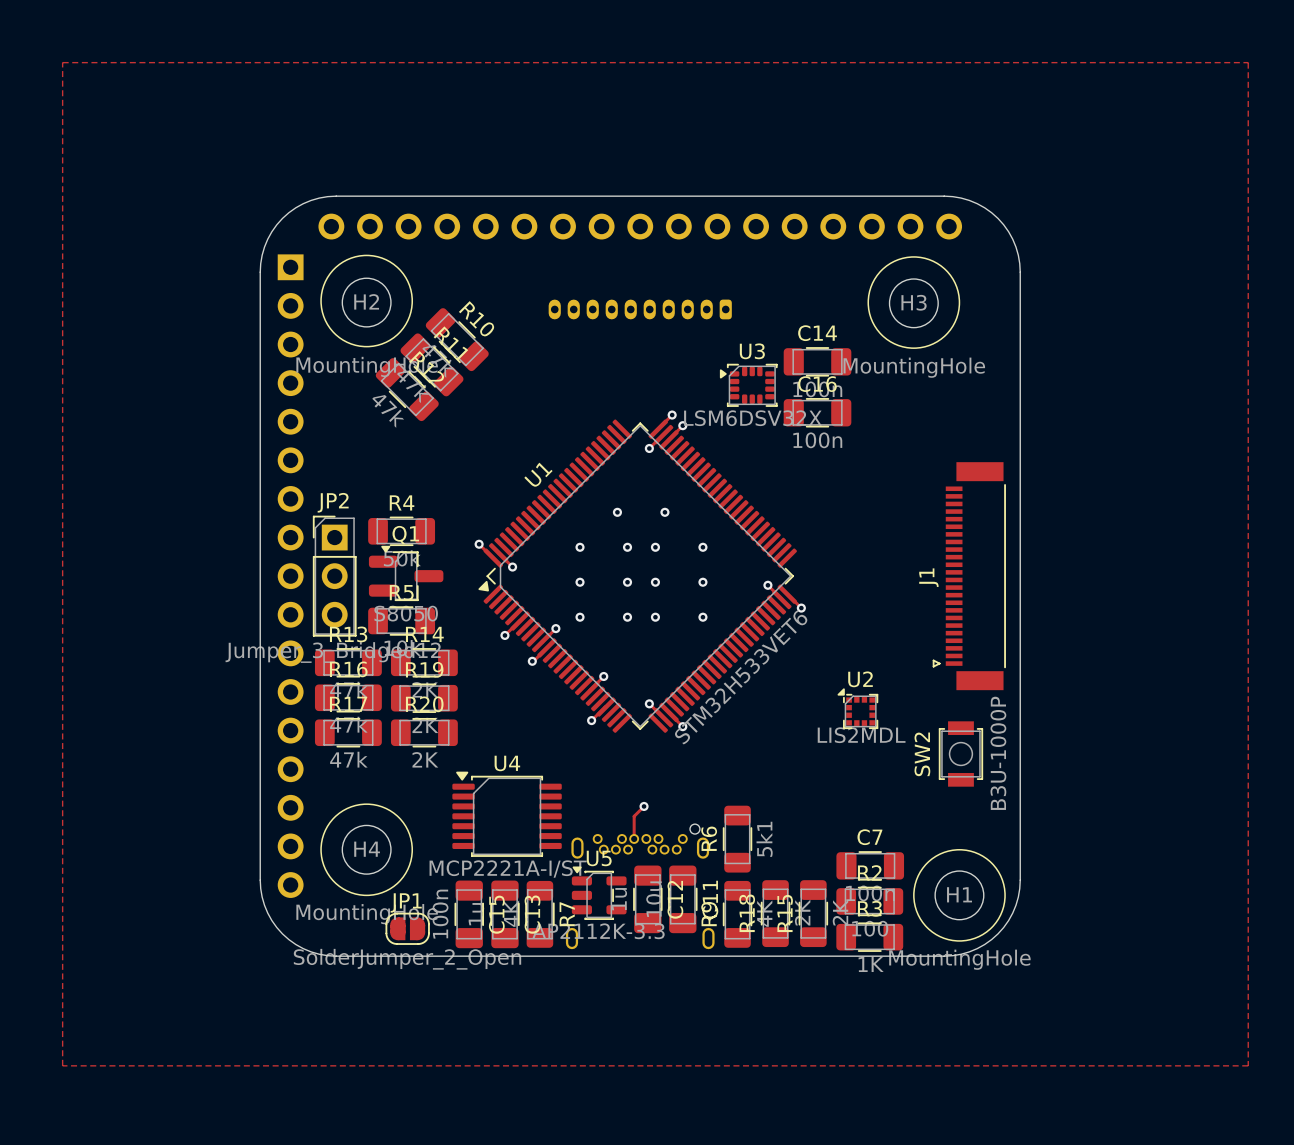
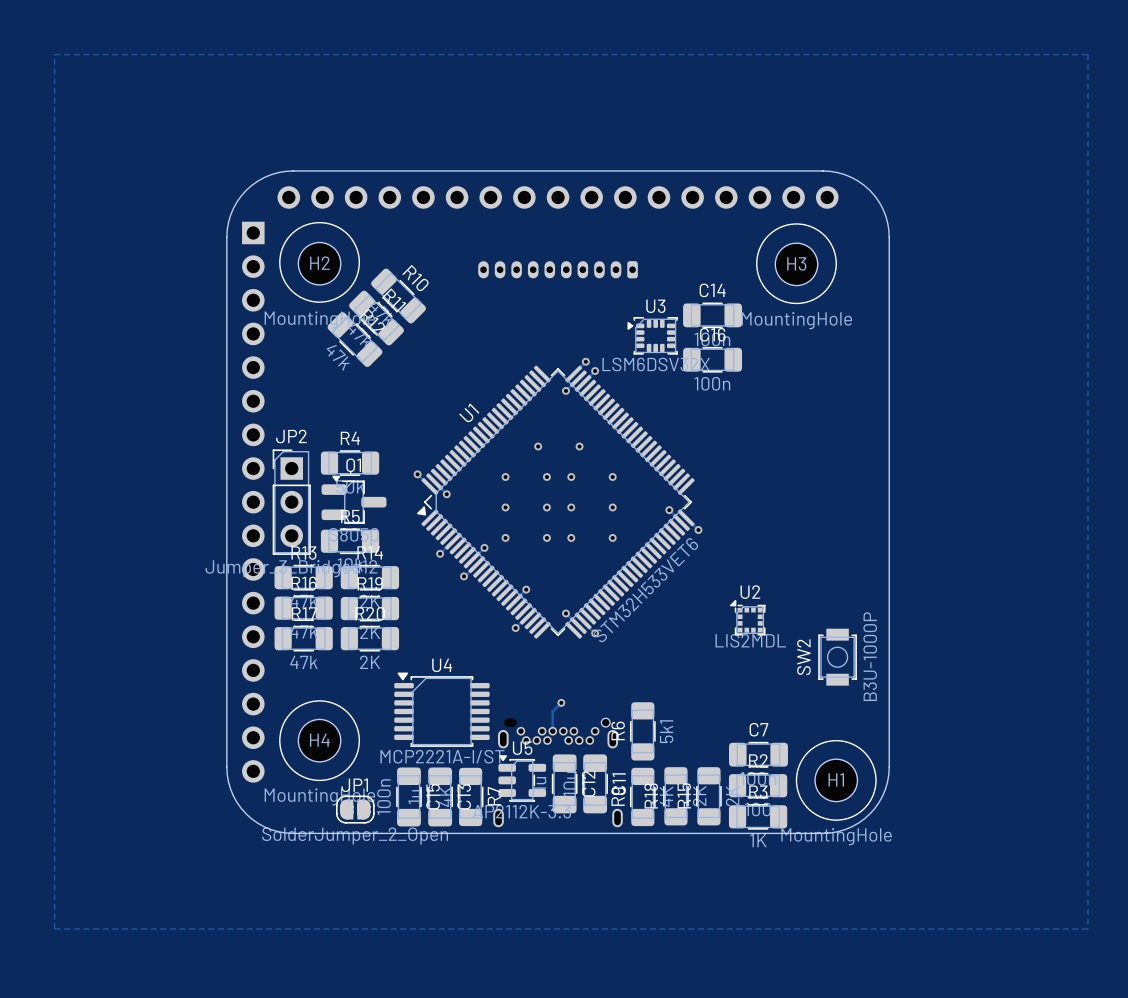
J1: (969, 576) -> none

